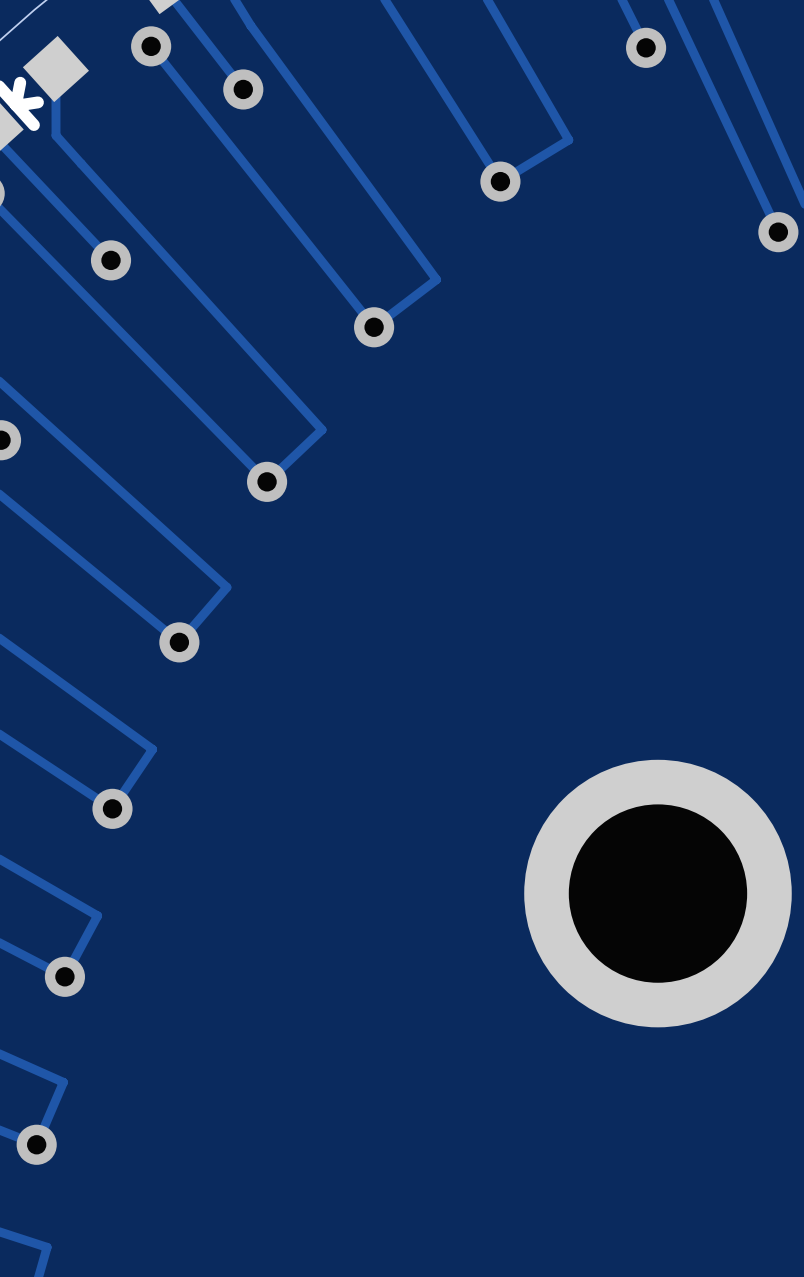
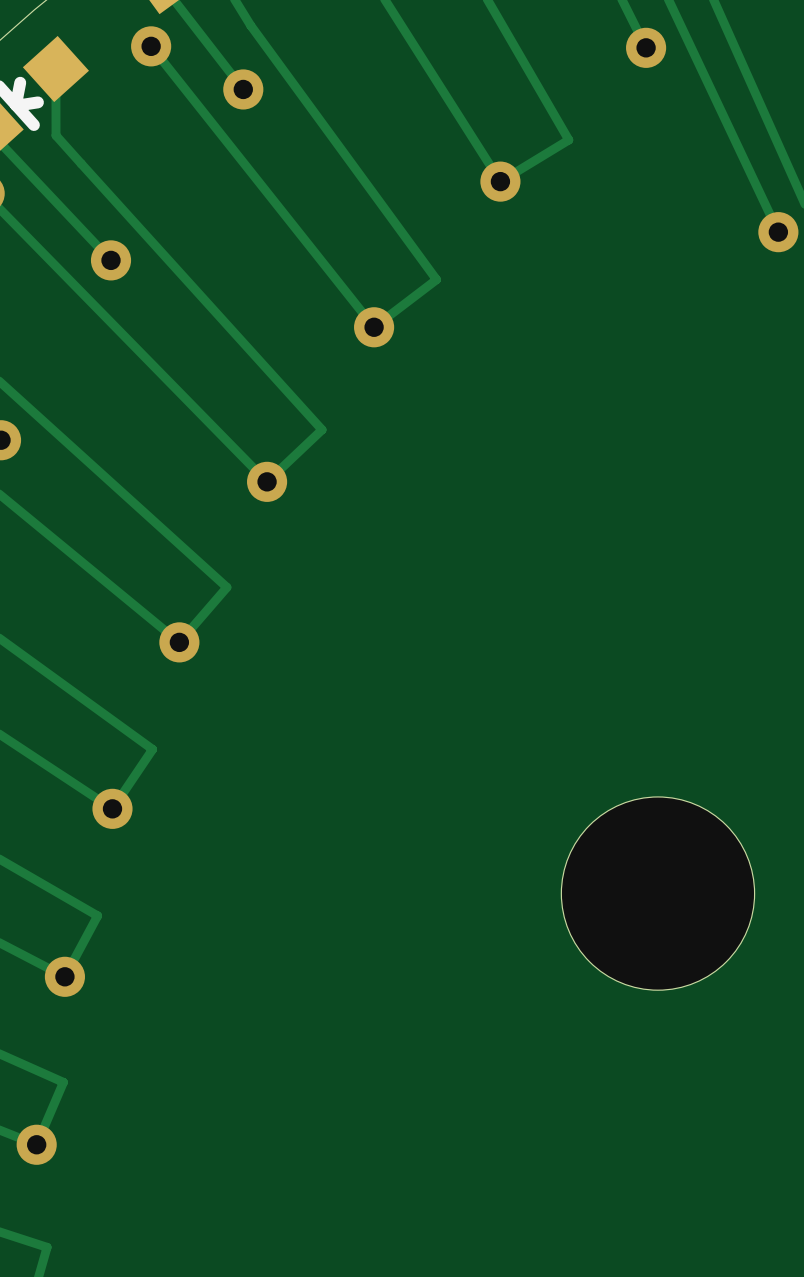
part footprint: [524, 759, 792, 1028] -> [561, 796, 755, 991]

